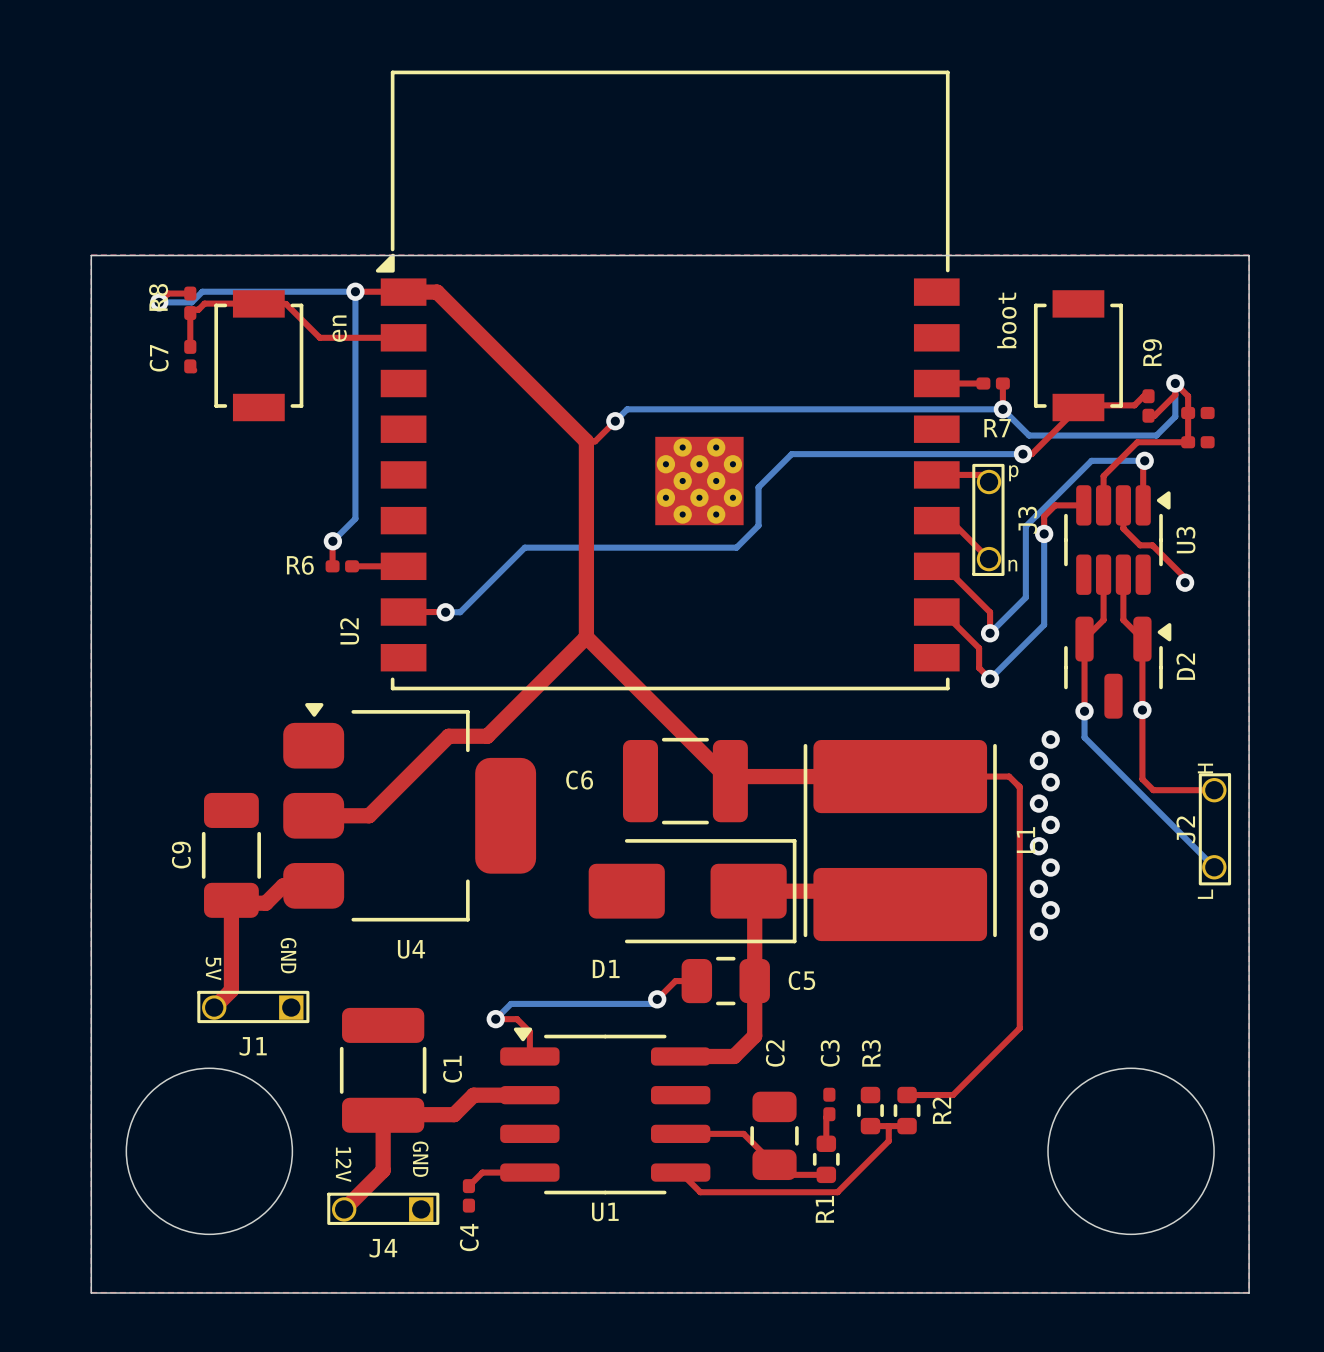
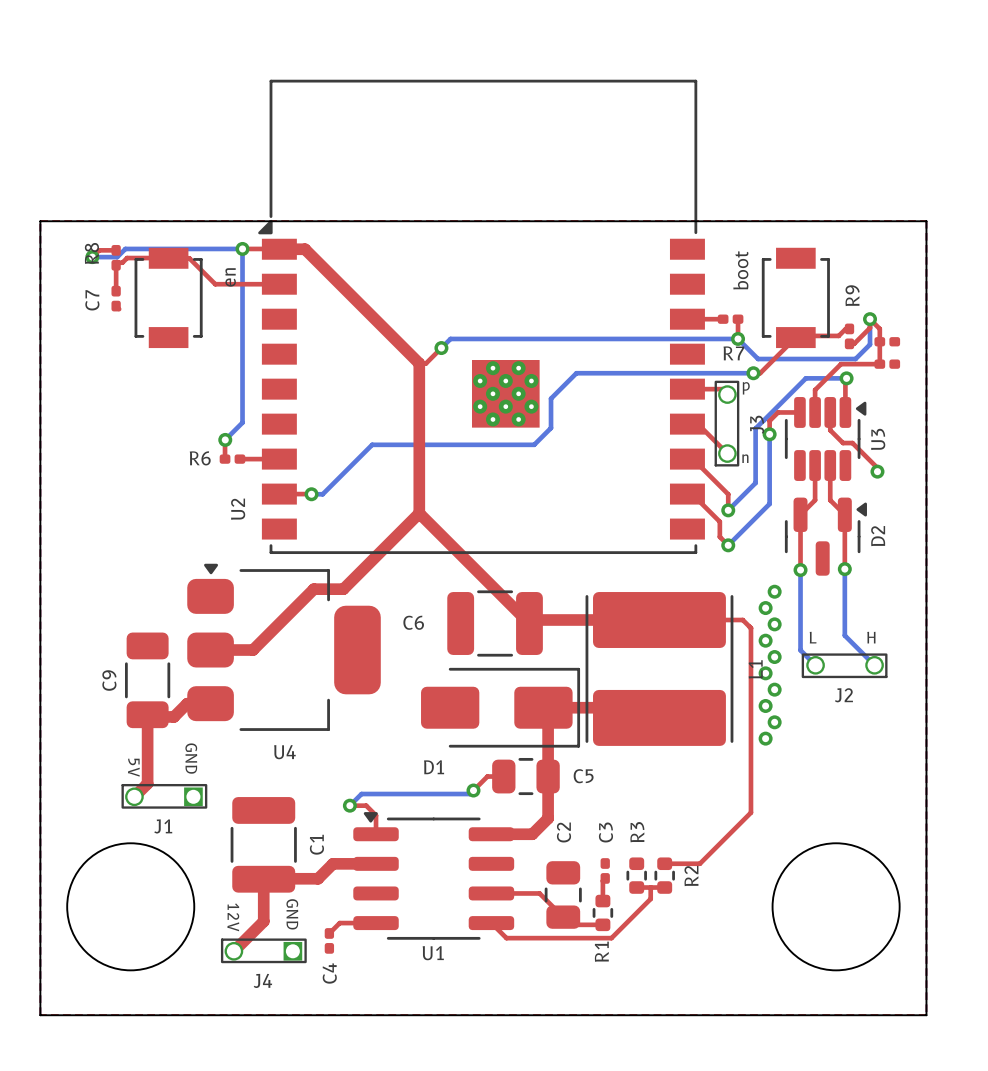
top track: (1142, 710) (1142, 779) (1153, 790) (1214, 790) -> none
bottom track: none -> (844, 569) (844, 635) (874, 665)
bottom track: (1084, 737) (1214, 867) -> (800, 590) (800, 650) (815, 665)
J2 footprint: [1198, 773, 1232, 886] -> [801, 653, 888, 679]

